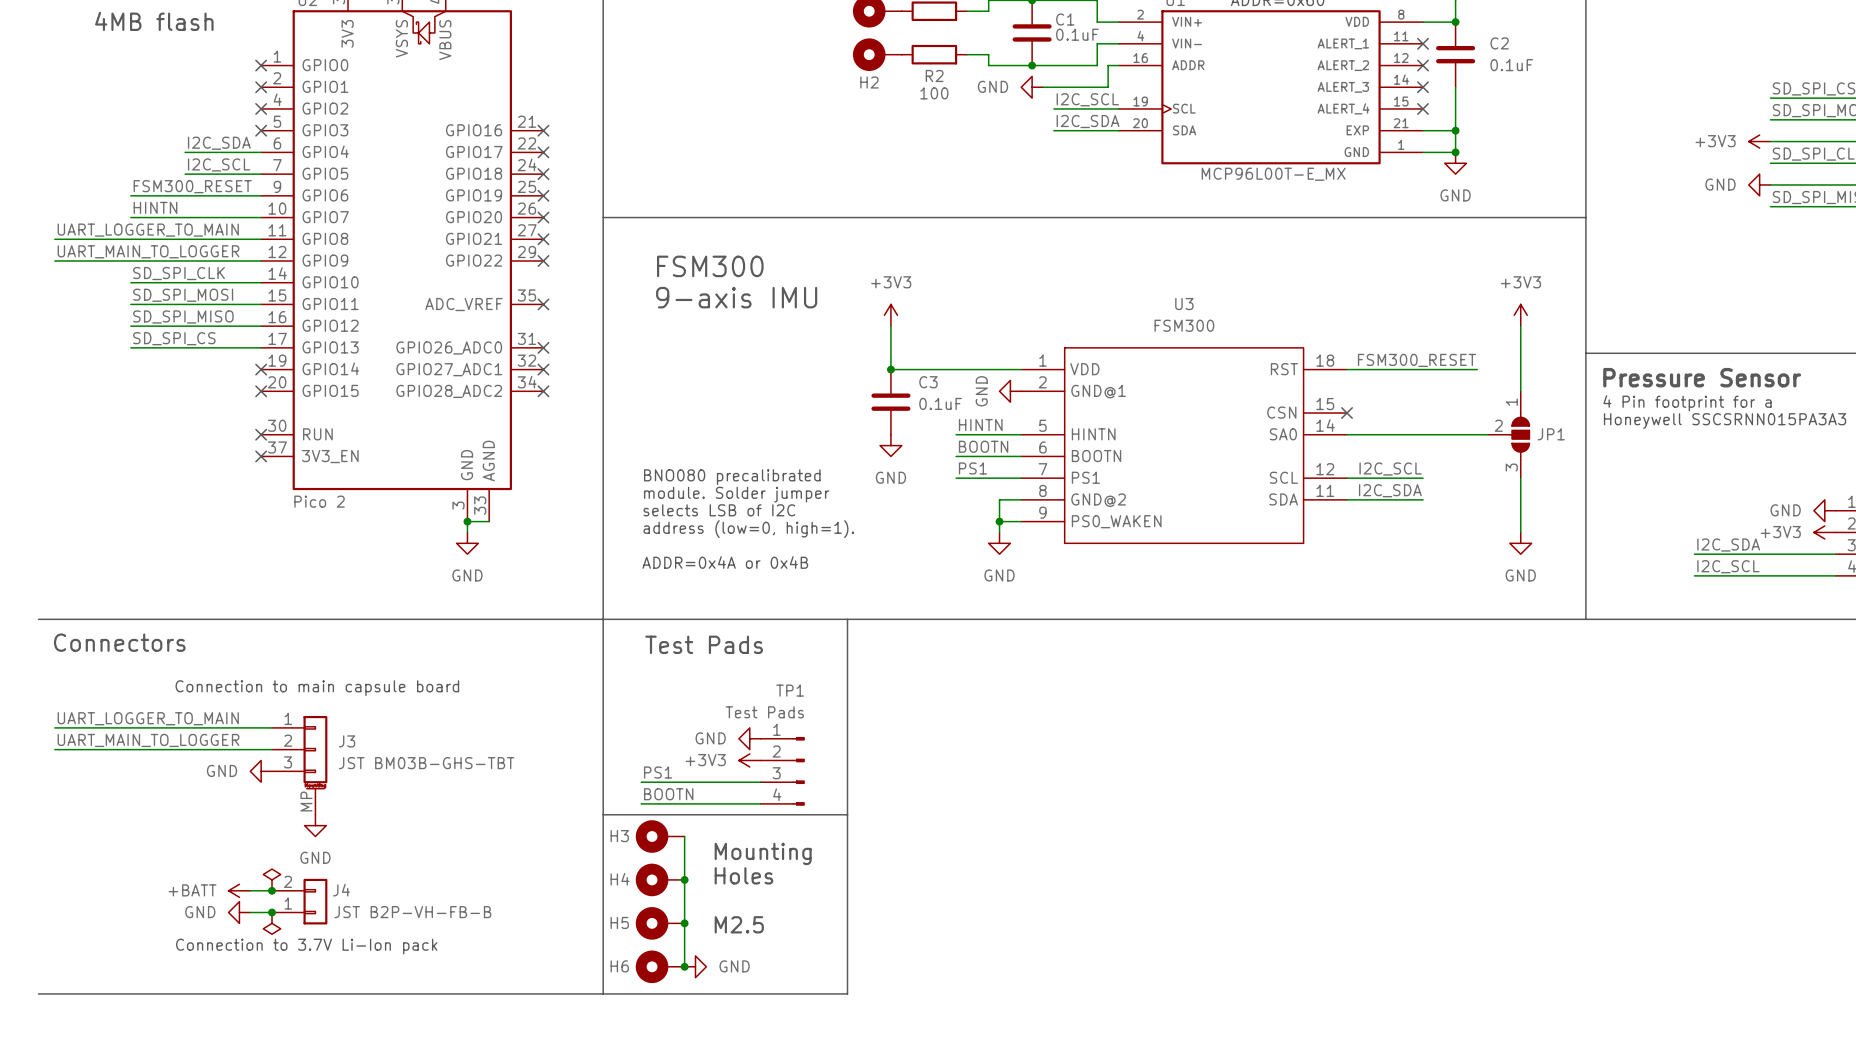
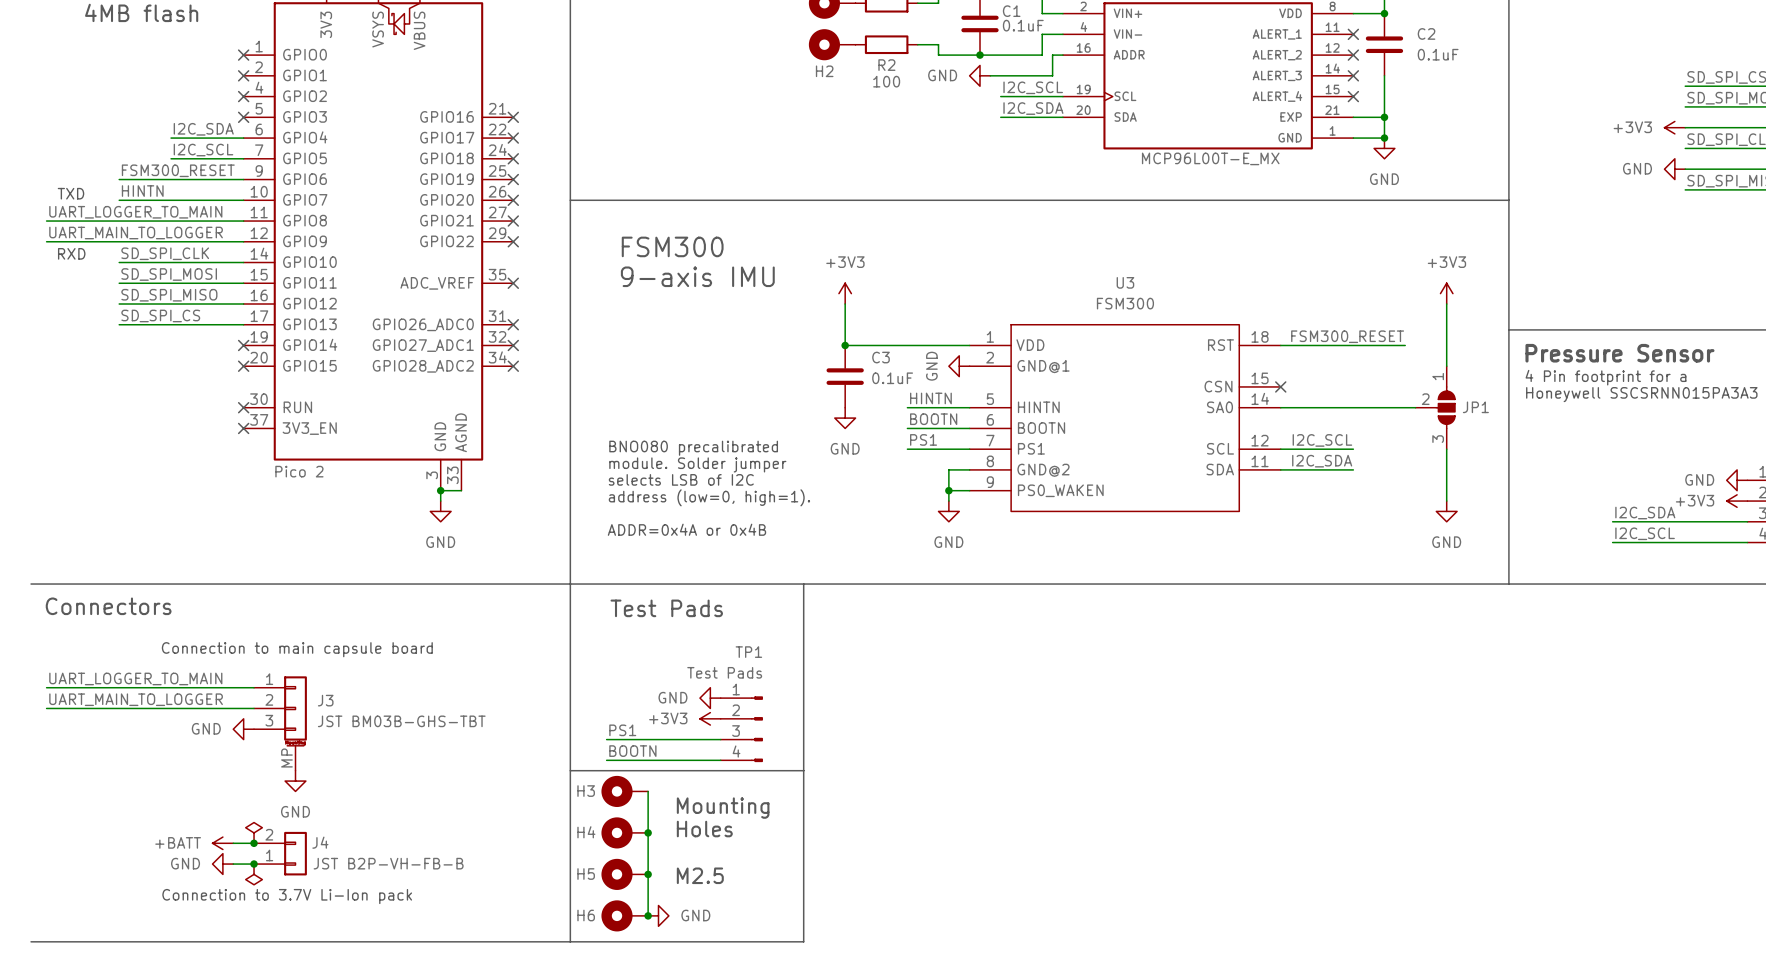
text: none -> TXD (70, 193)
text: none -> RXD (71, 253)

